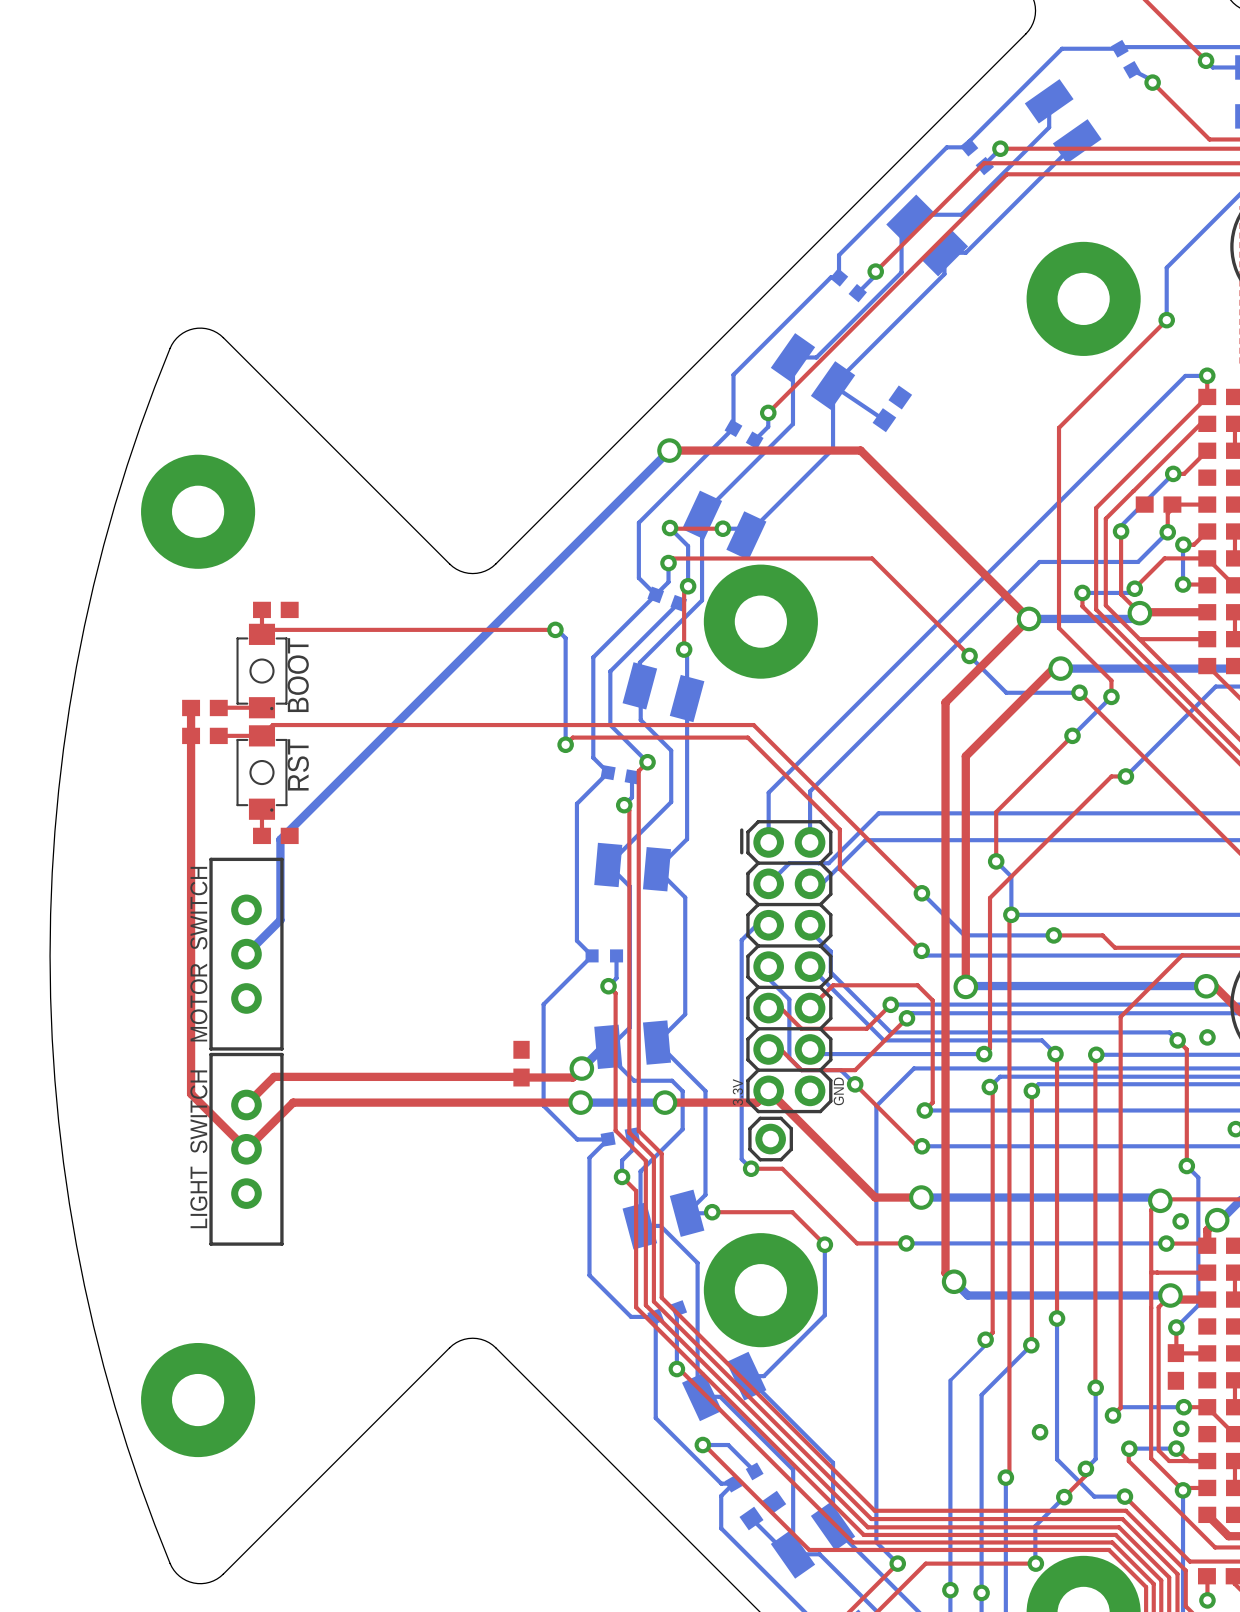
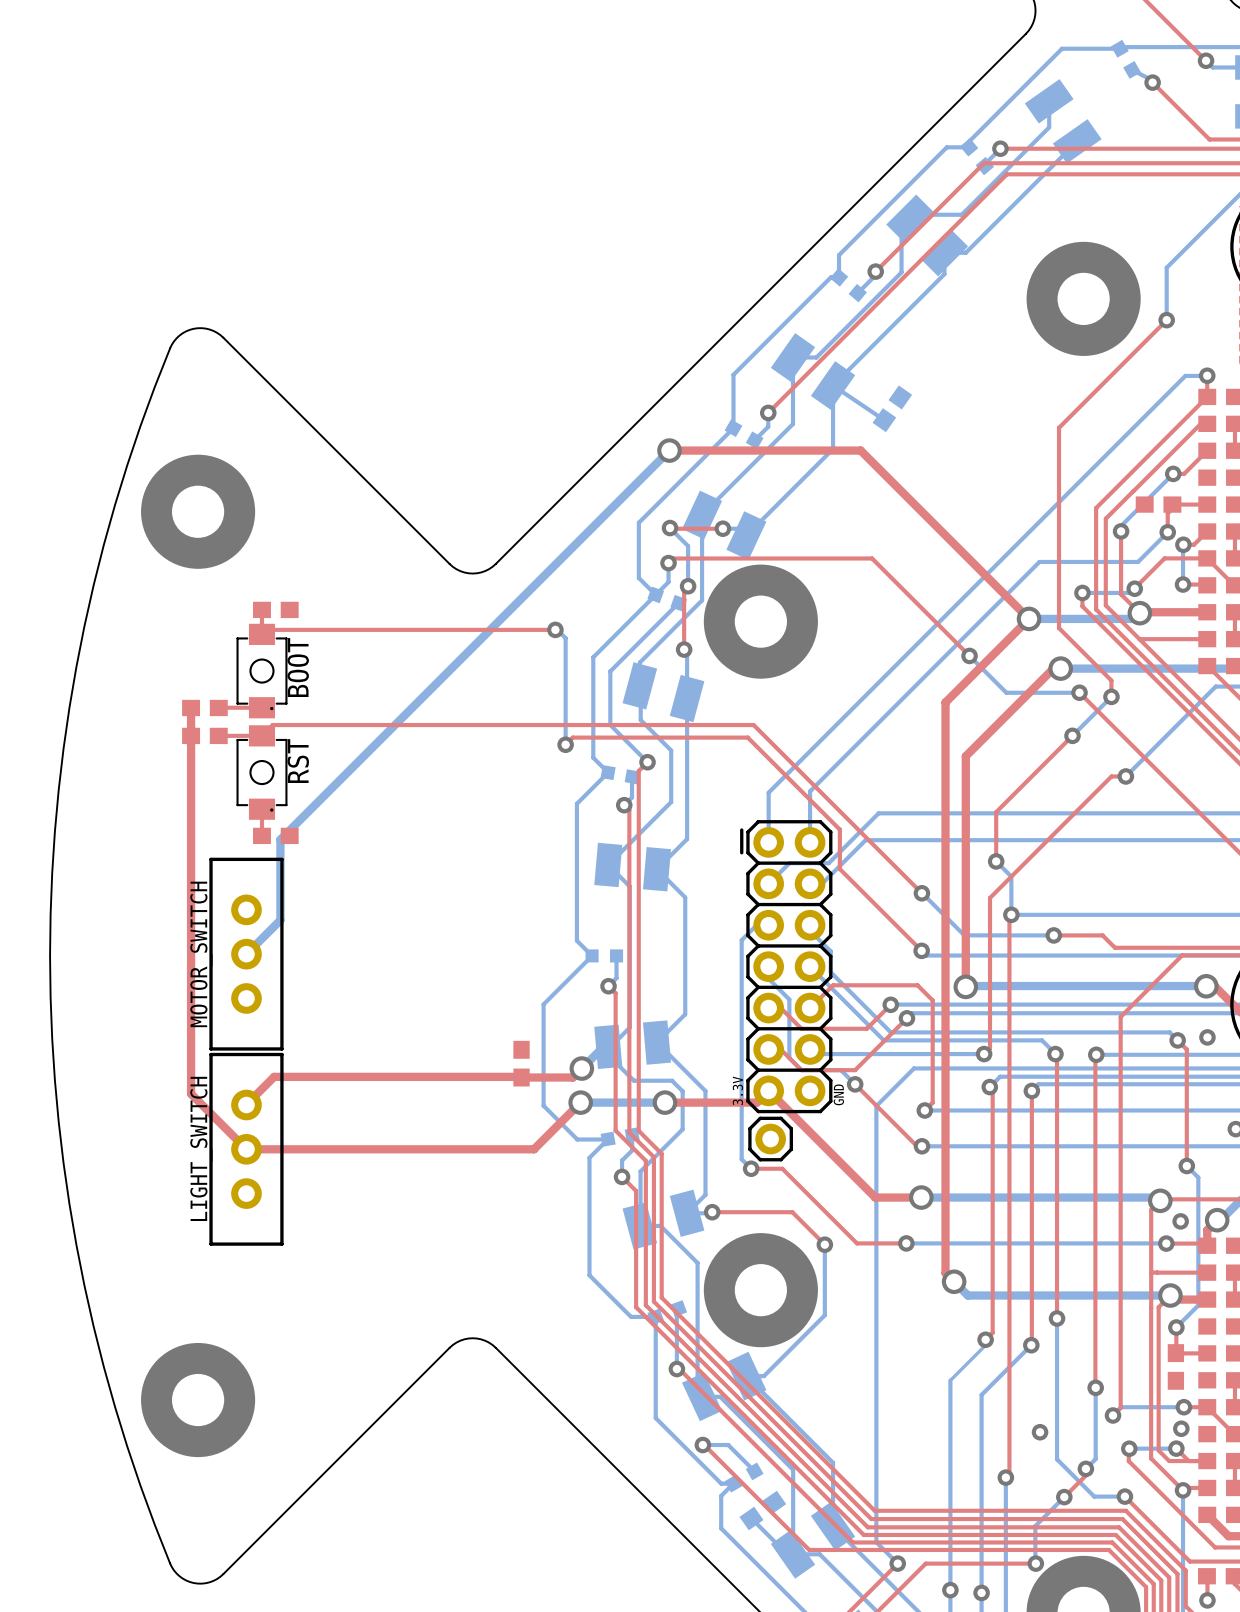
top track: (580, 1102) (293, 1102) (246, 1149) -> (580, 1102) (533, 1149) (246, 1149)

